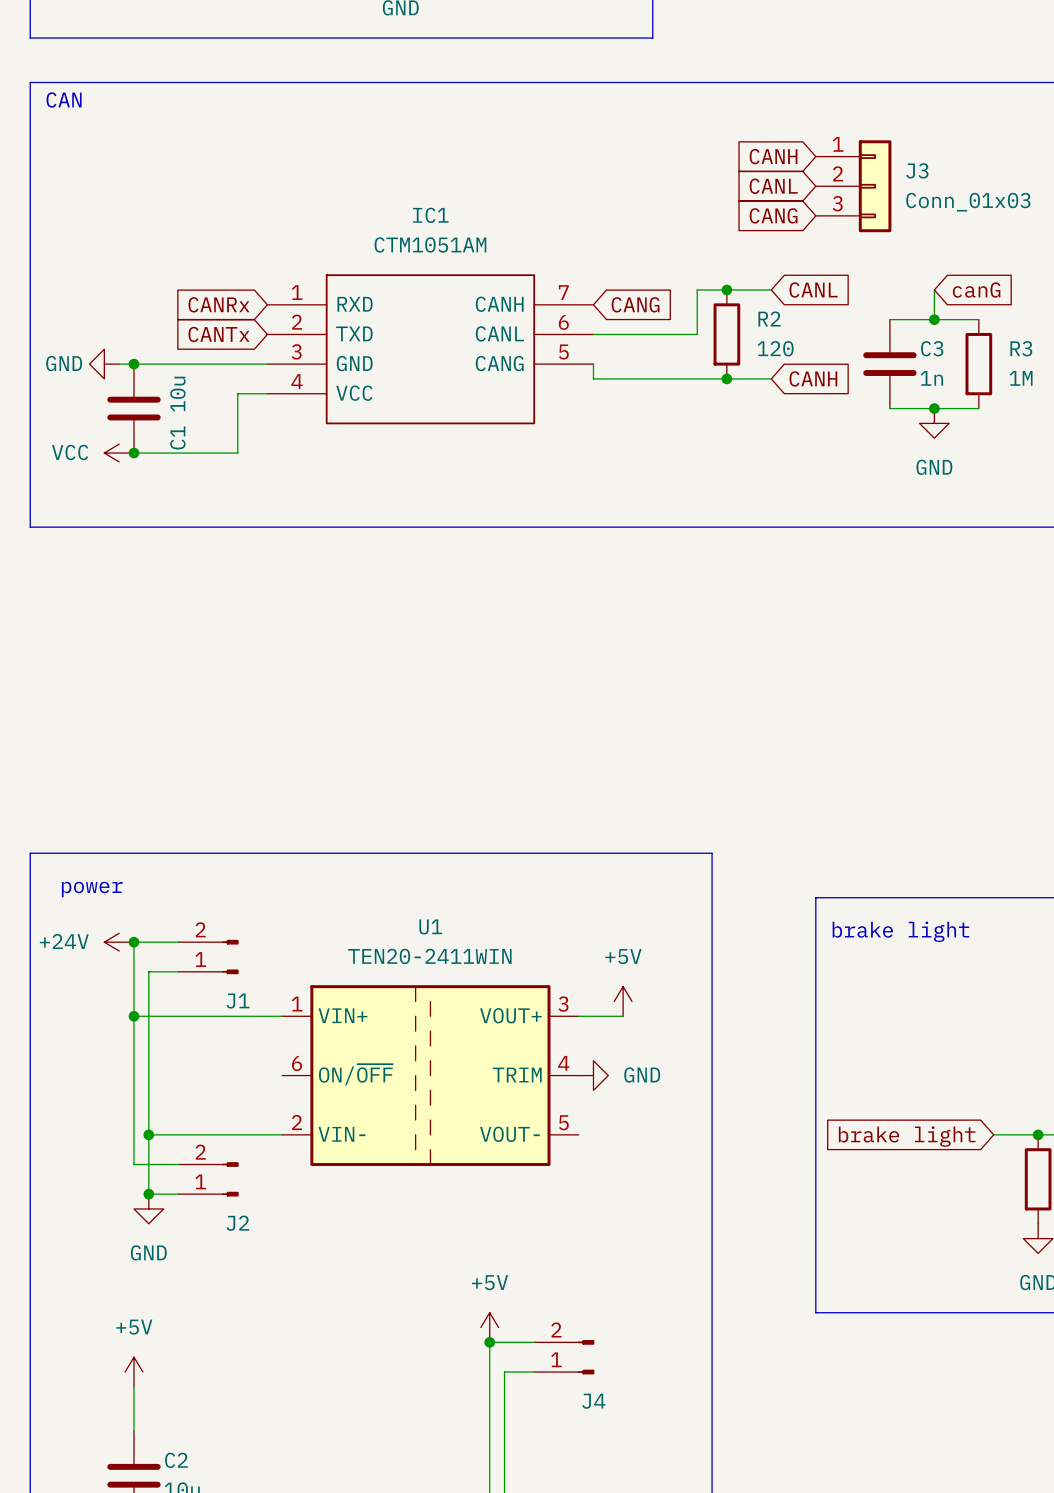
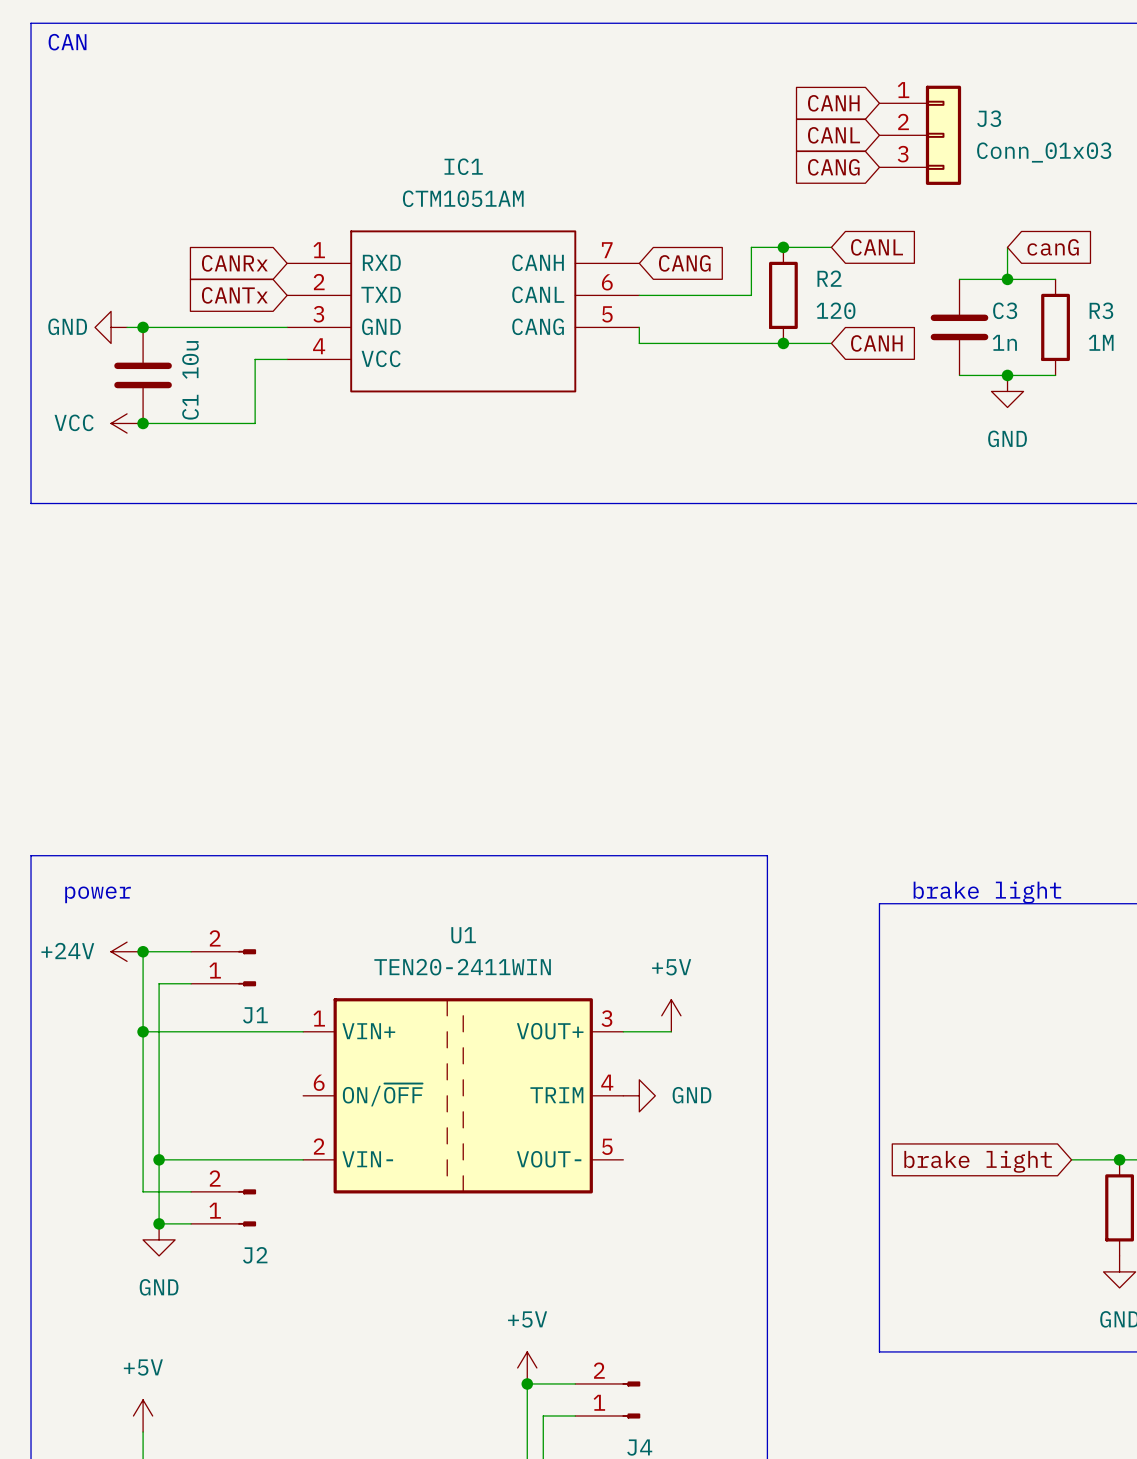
text position: brake light (900, 931) -> brake light (987, 892)

